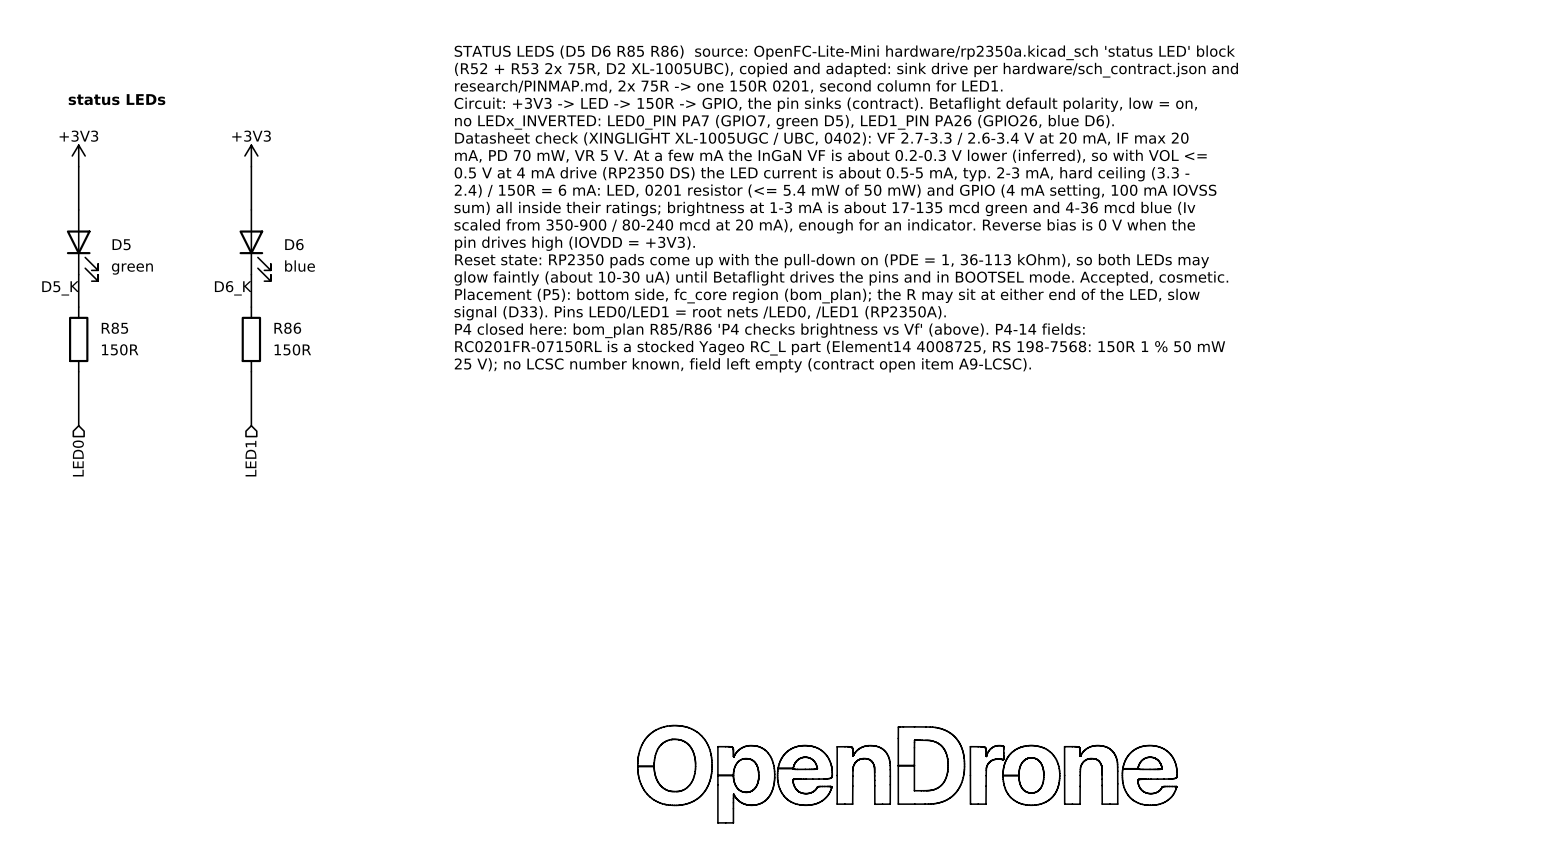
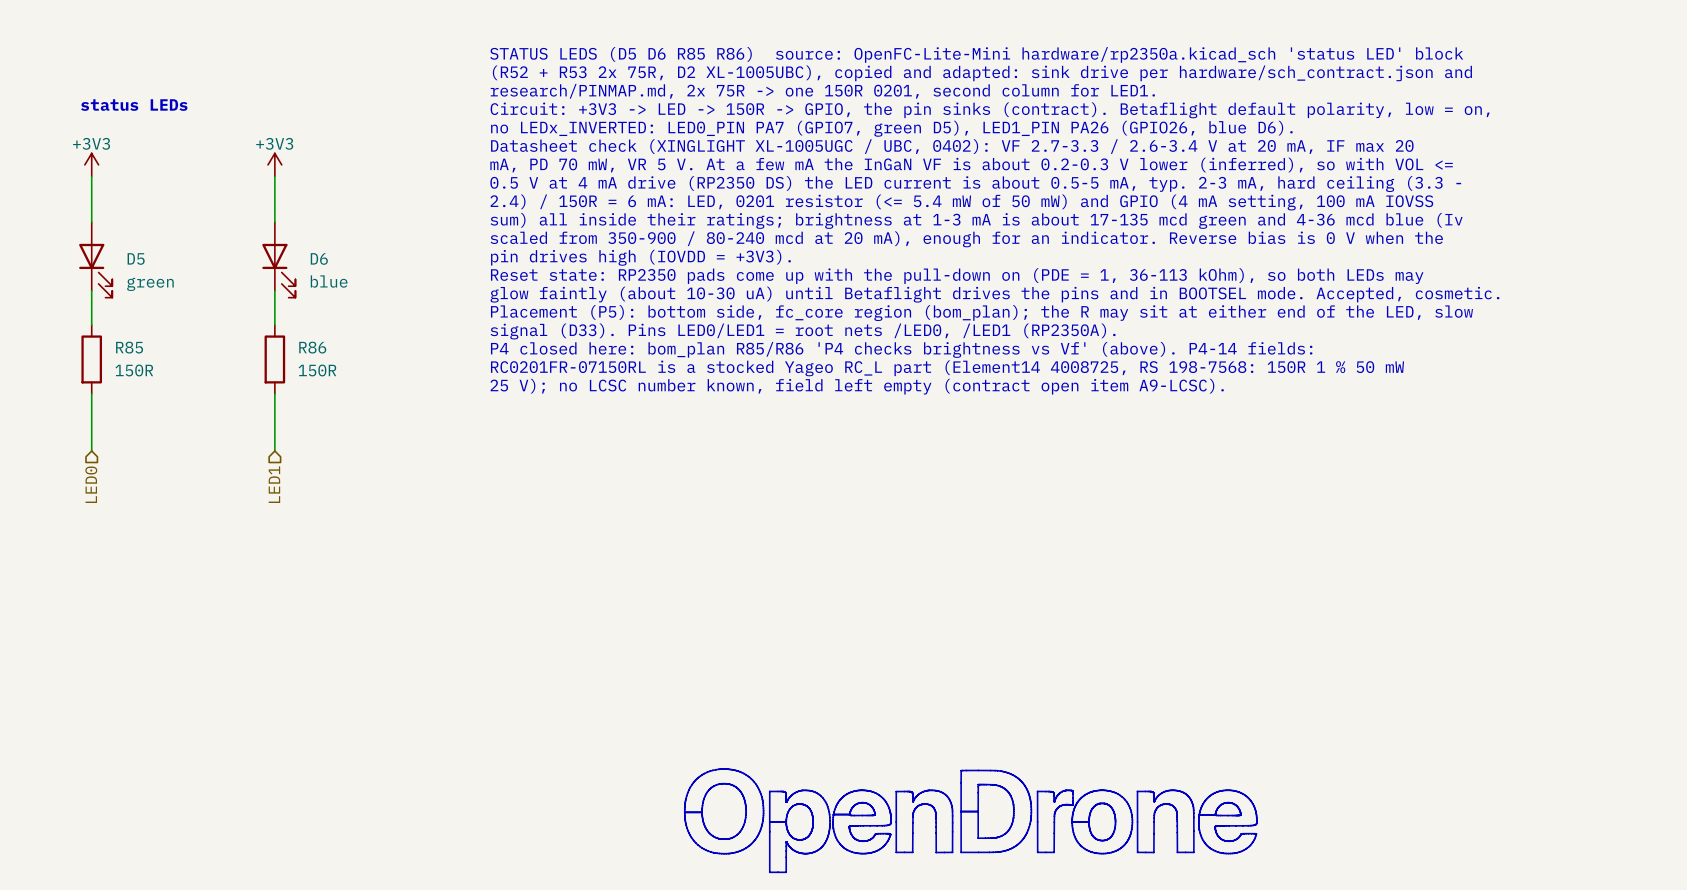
label: D5_K (60, 288) -> none
label: D6_K (233, 288) -> none

